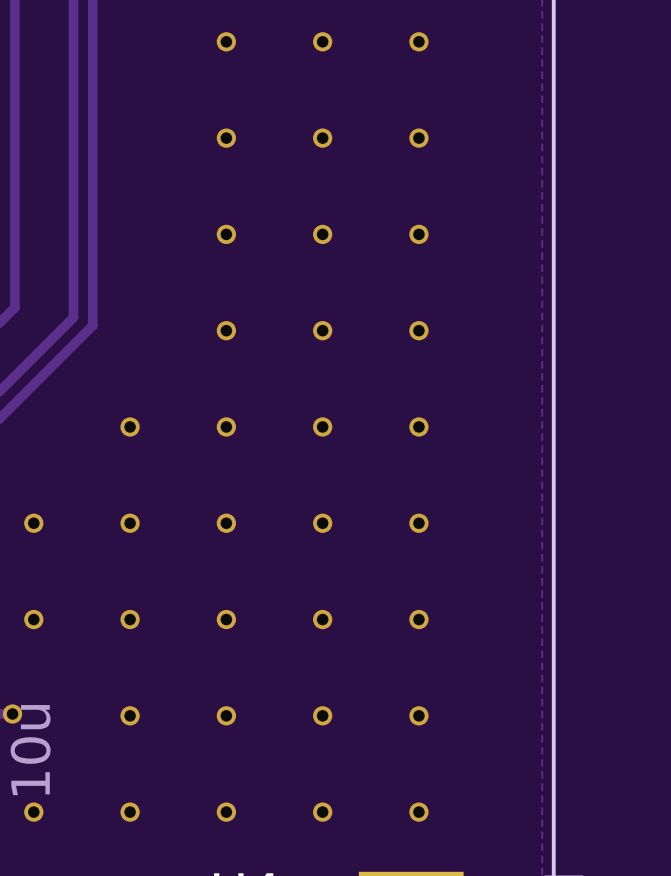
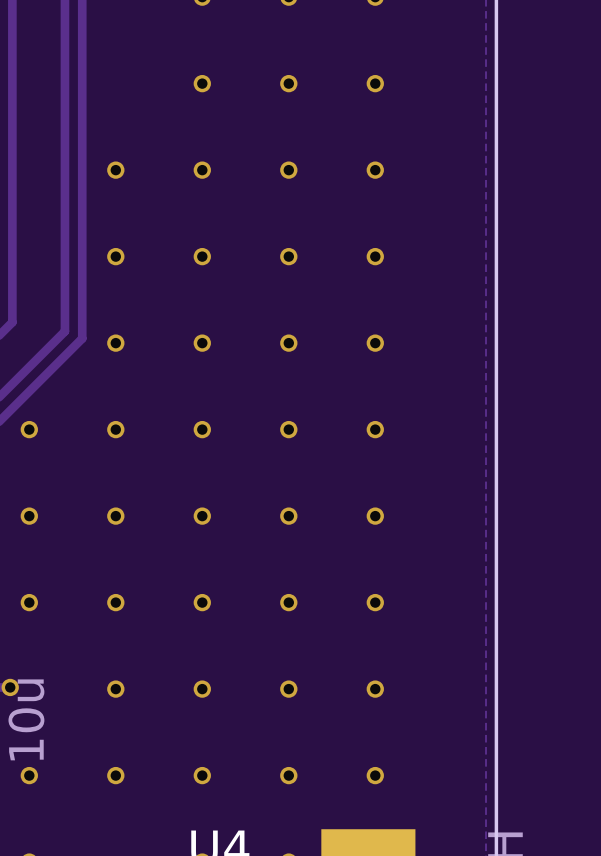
via: none -> (115, 170)
via: none -> (115, 256)
via: none -> (115, 343)
via: none -> (29, 429)

